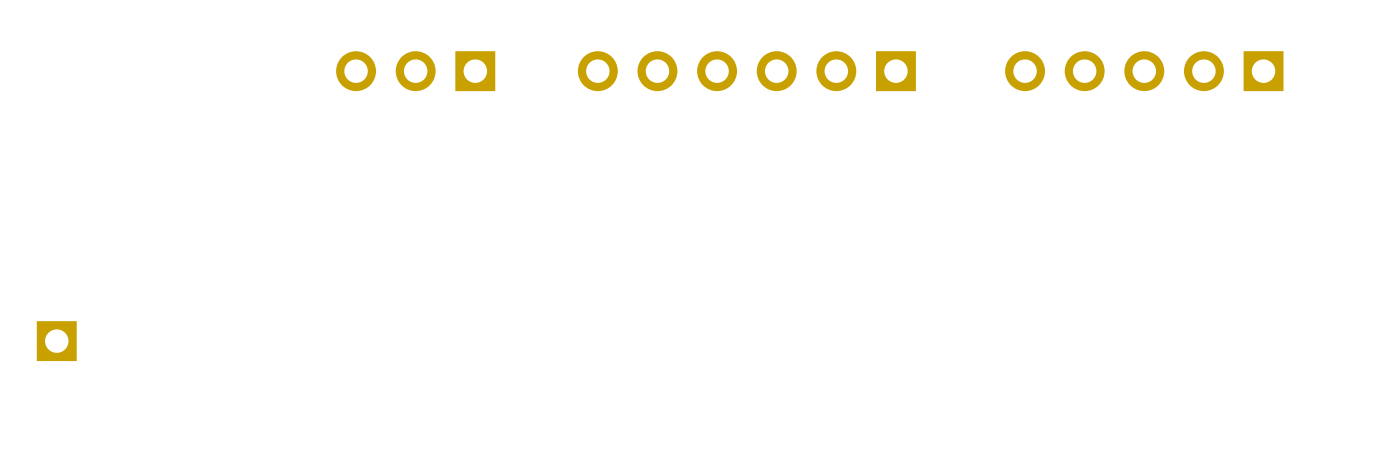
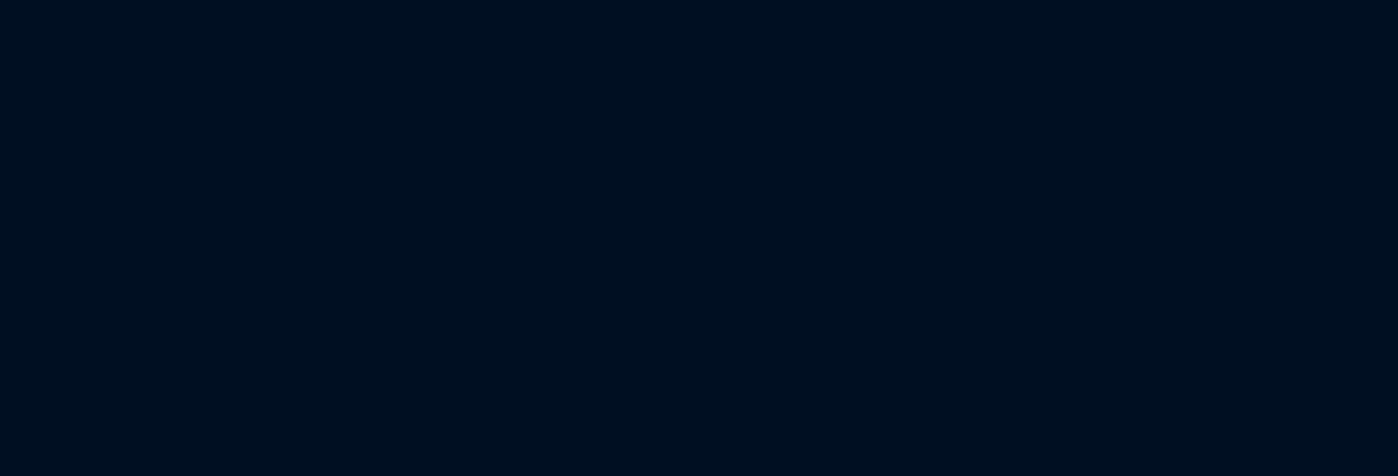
part: (415, 71) -> none
part: (746, 71) -> none
part: (1144, 71) -> none
part: (56, 341) -> none

